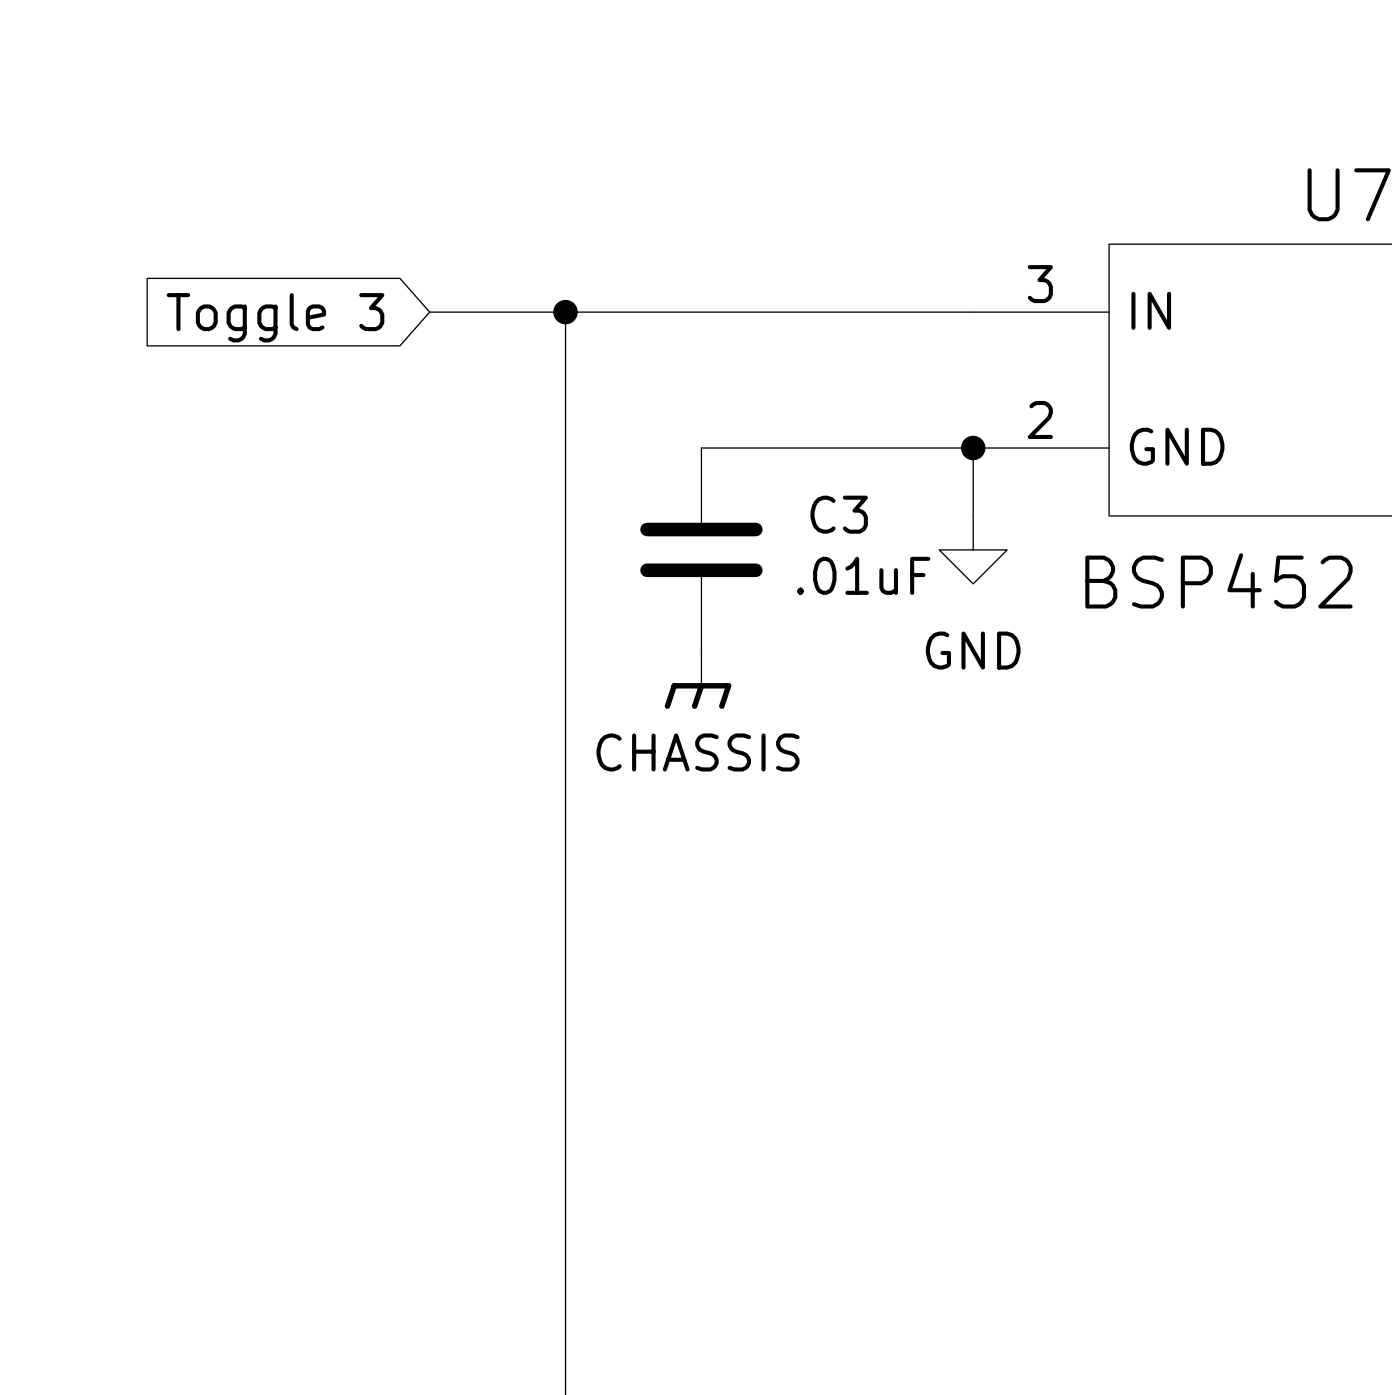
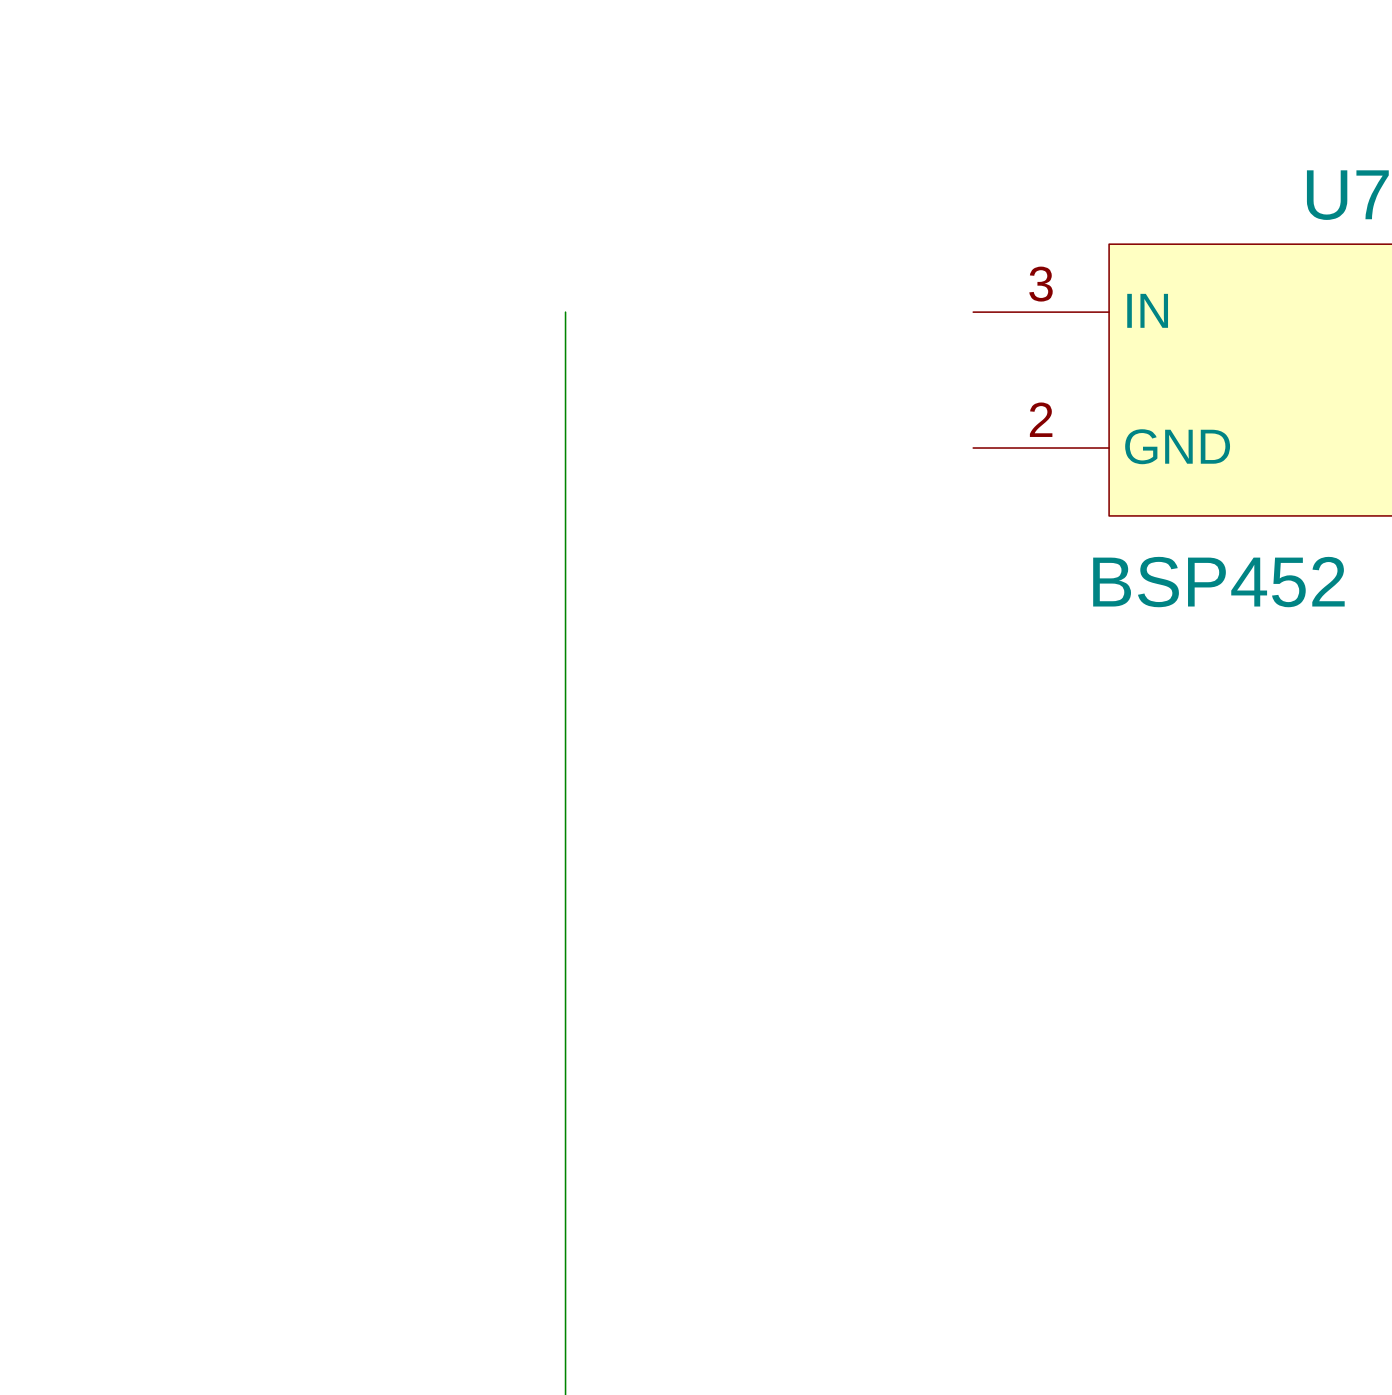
wire: (429, 312) (973, 312) -> none
junction: (565, 312) -> none
global label: Toggle 3 (275, 317) -> none
wire: (701, 448) (973, 448) (973, 515) -> none
junction: (973, 448) -> none
C3: .01uF (701, 549) -> none
power symbol: GND (973, 549) -> none
power symbol: CHASSIS (698, 680) -> none

